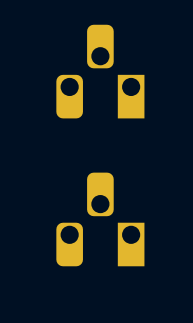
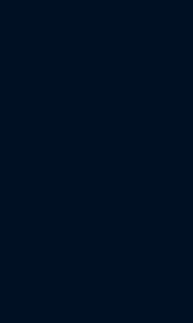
part: (100, 71) -> none
part: (100, 219) -> none

